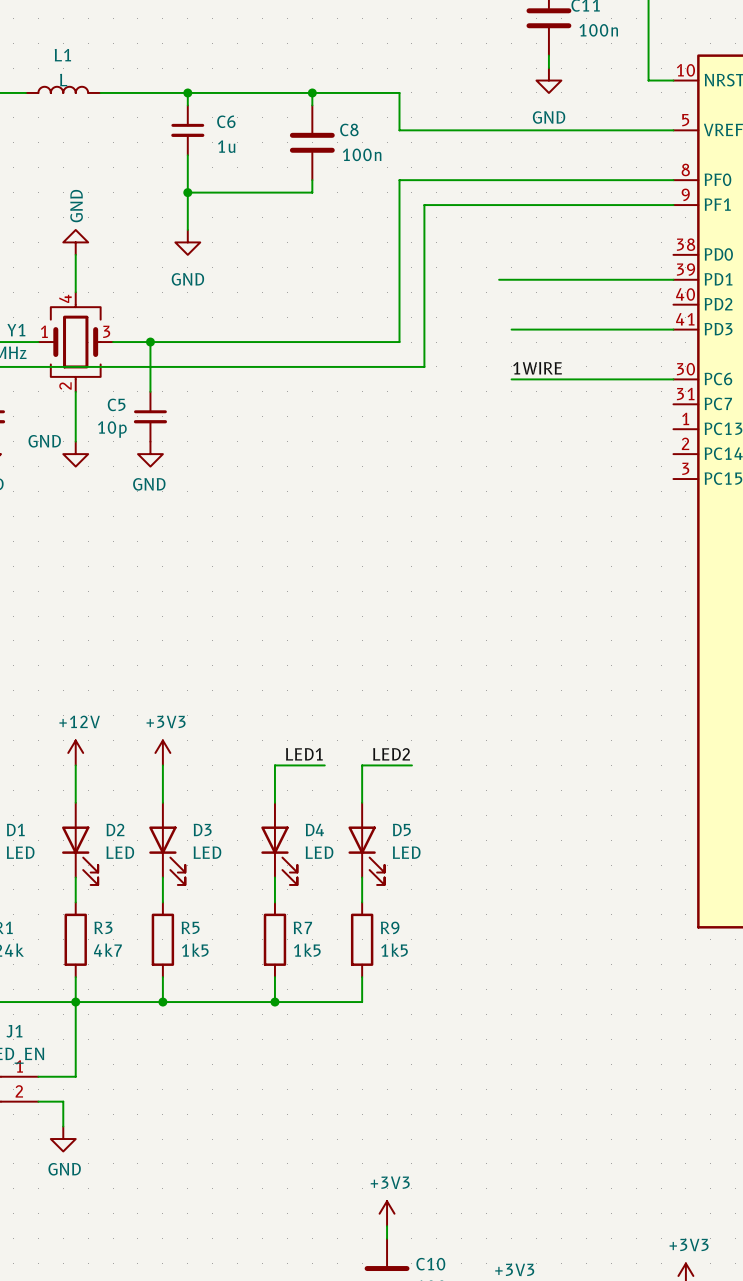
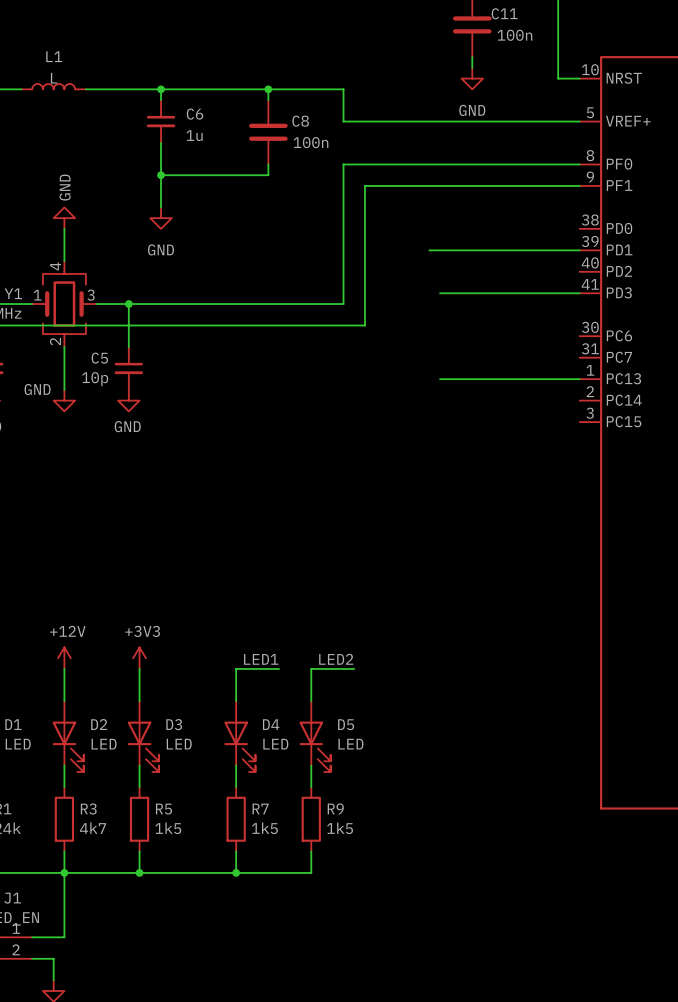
label: 1WIRE (537, 368) -> none
wire: (511, 379) (673, 379) -> (440, 379) (579, 379)

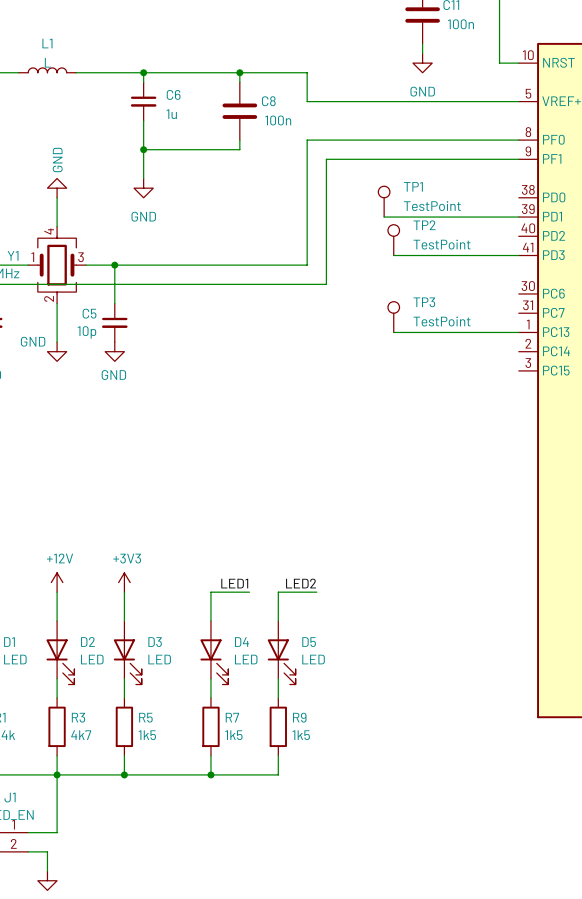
TP1: none -> TestPoint (384, 201)
TP2: none -> TestPoint (393, 240)
TP3: none -> TestPoint (393, 317)

